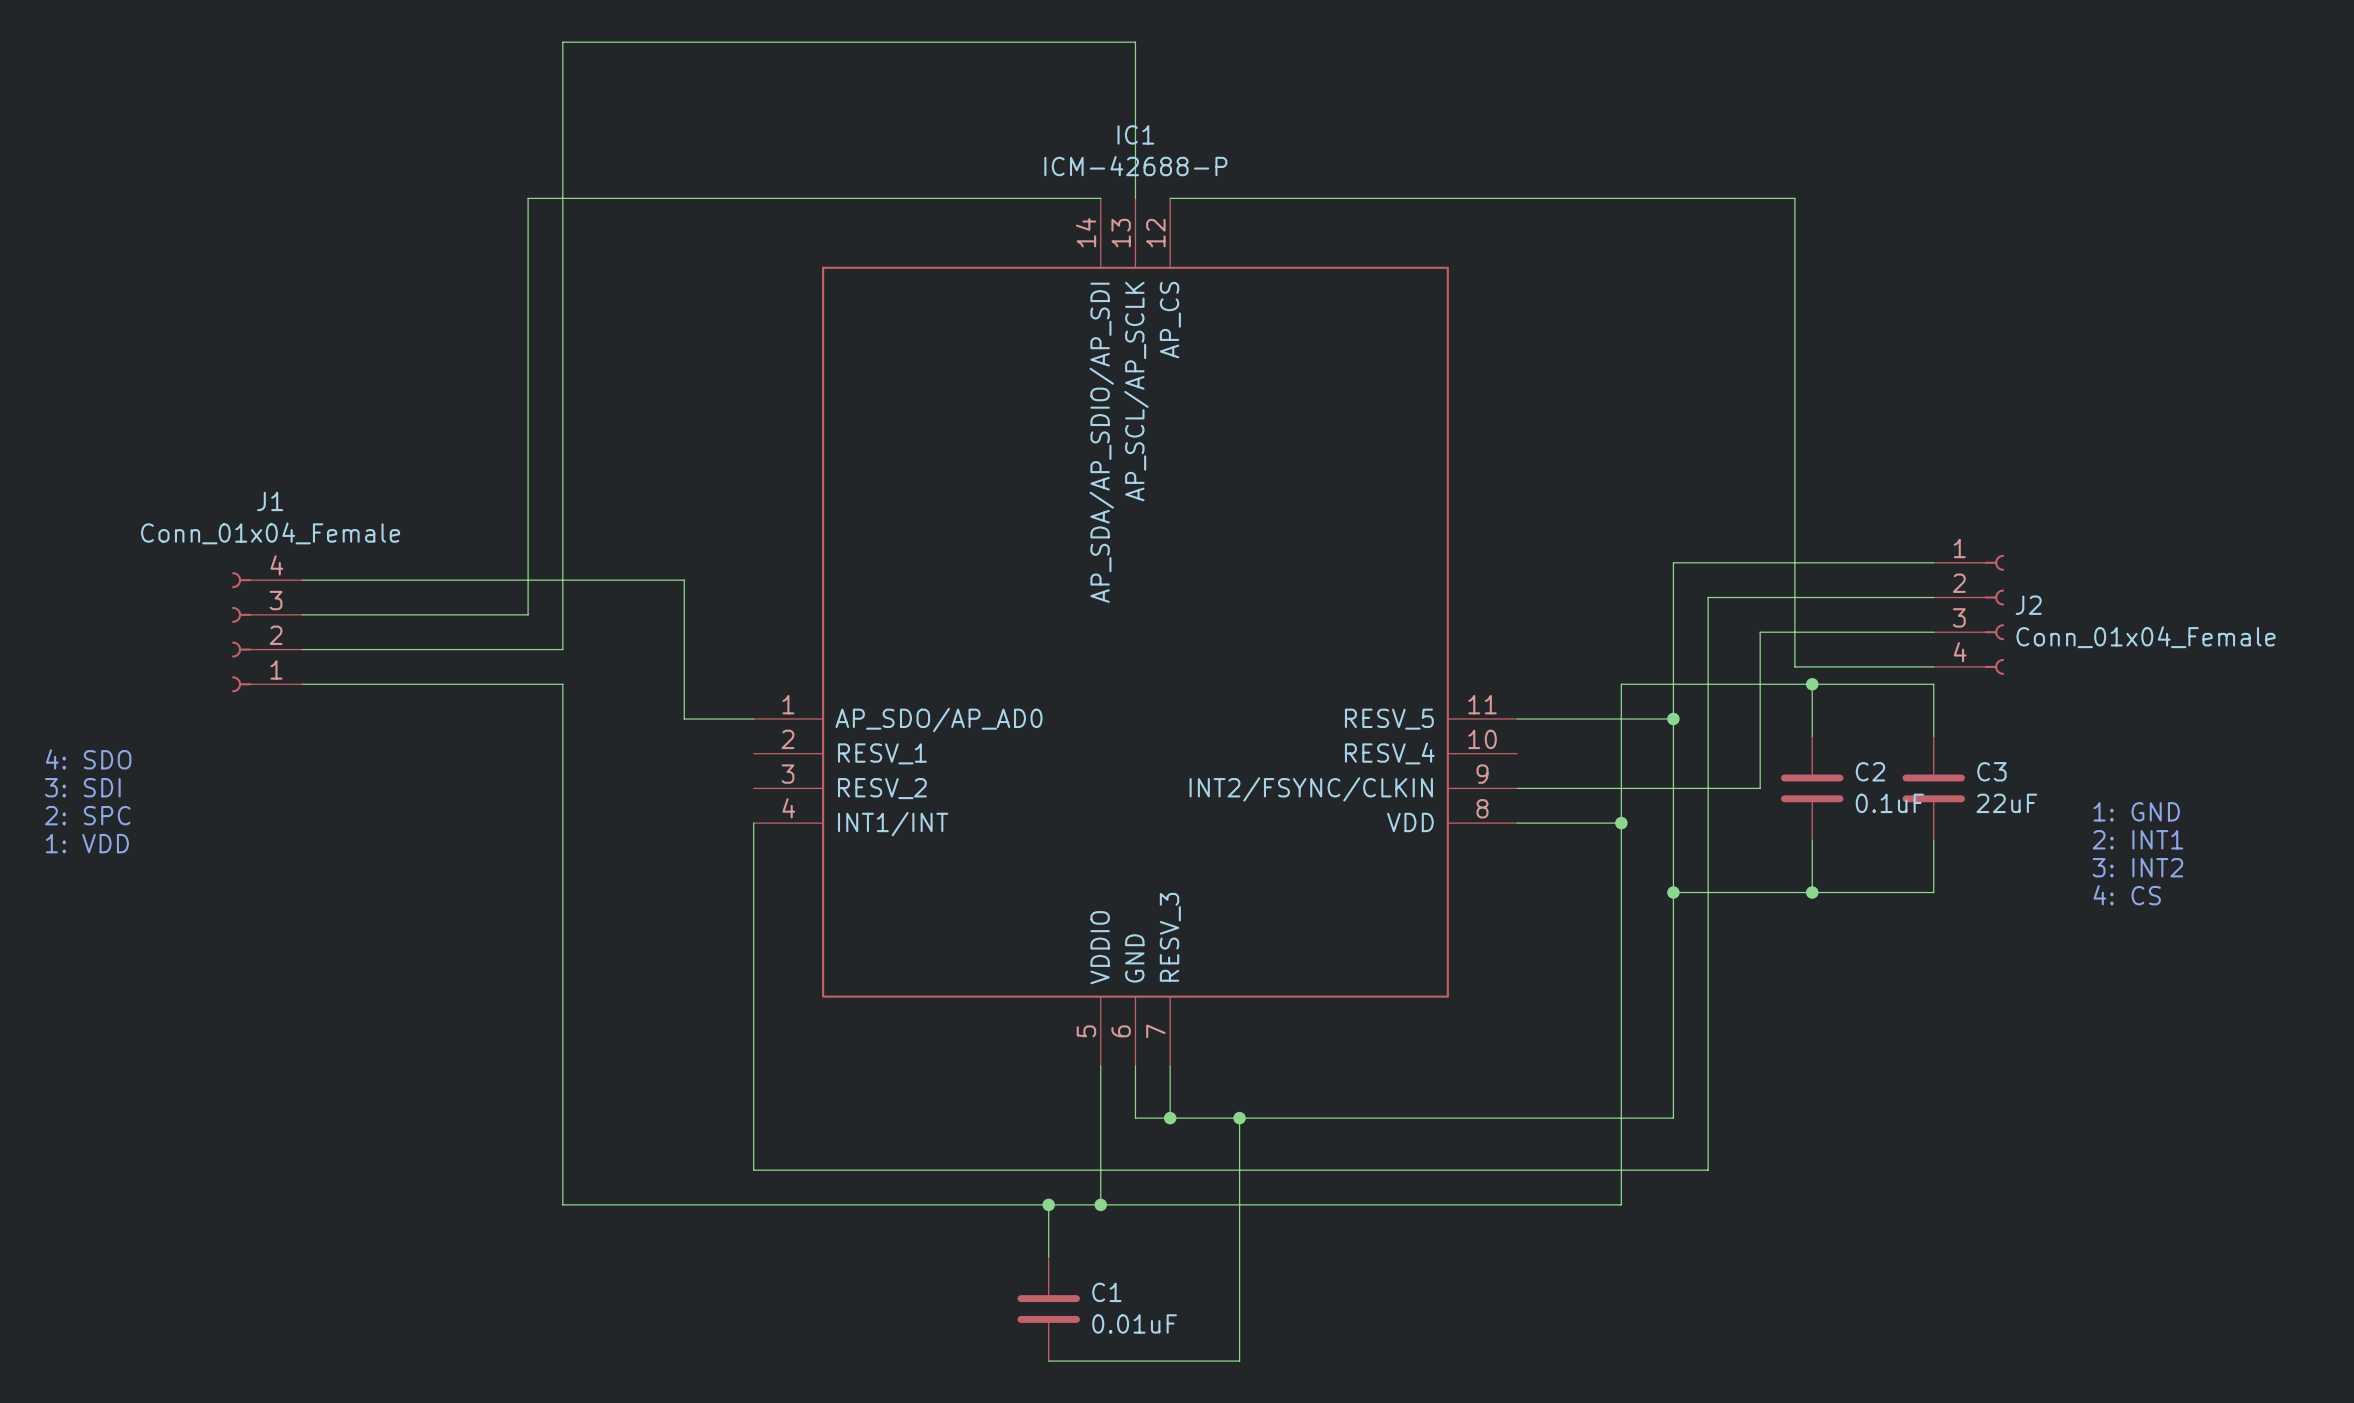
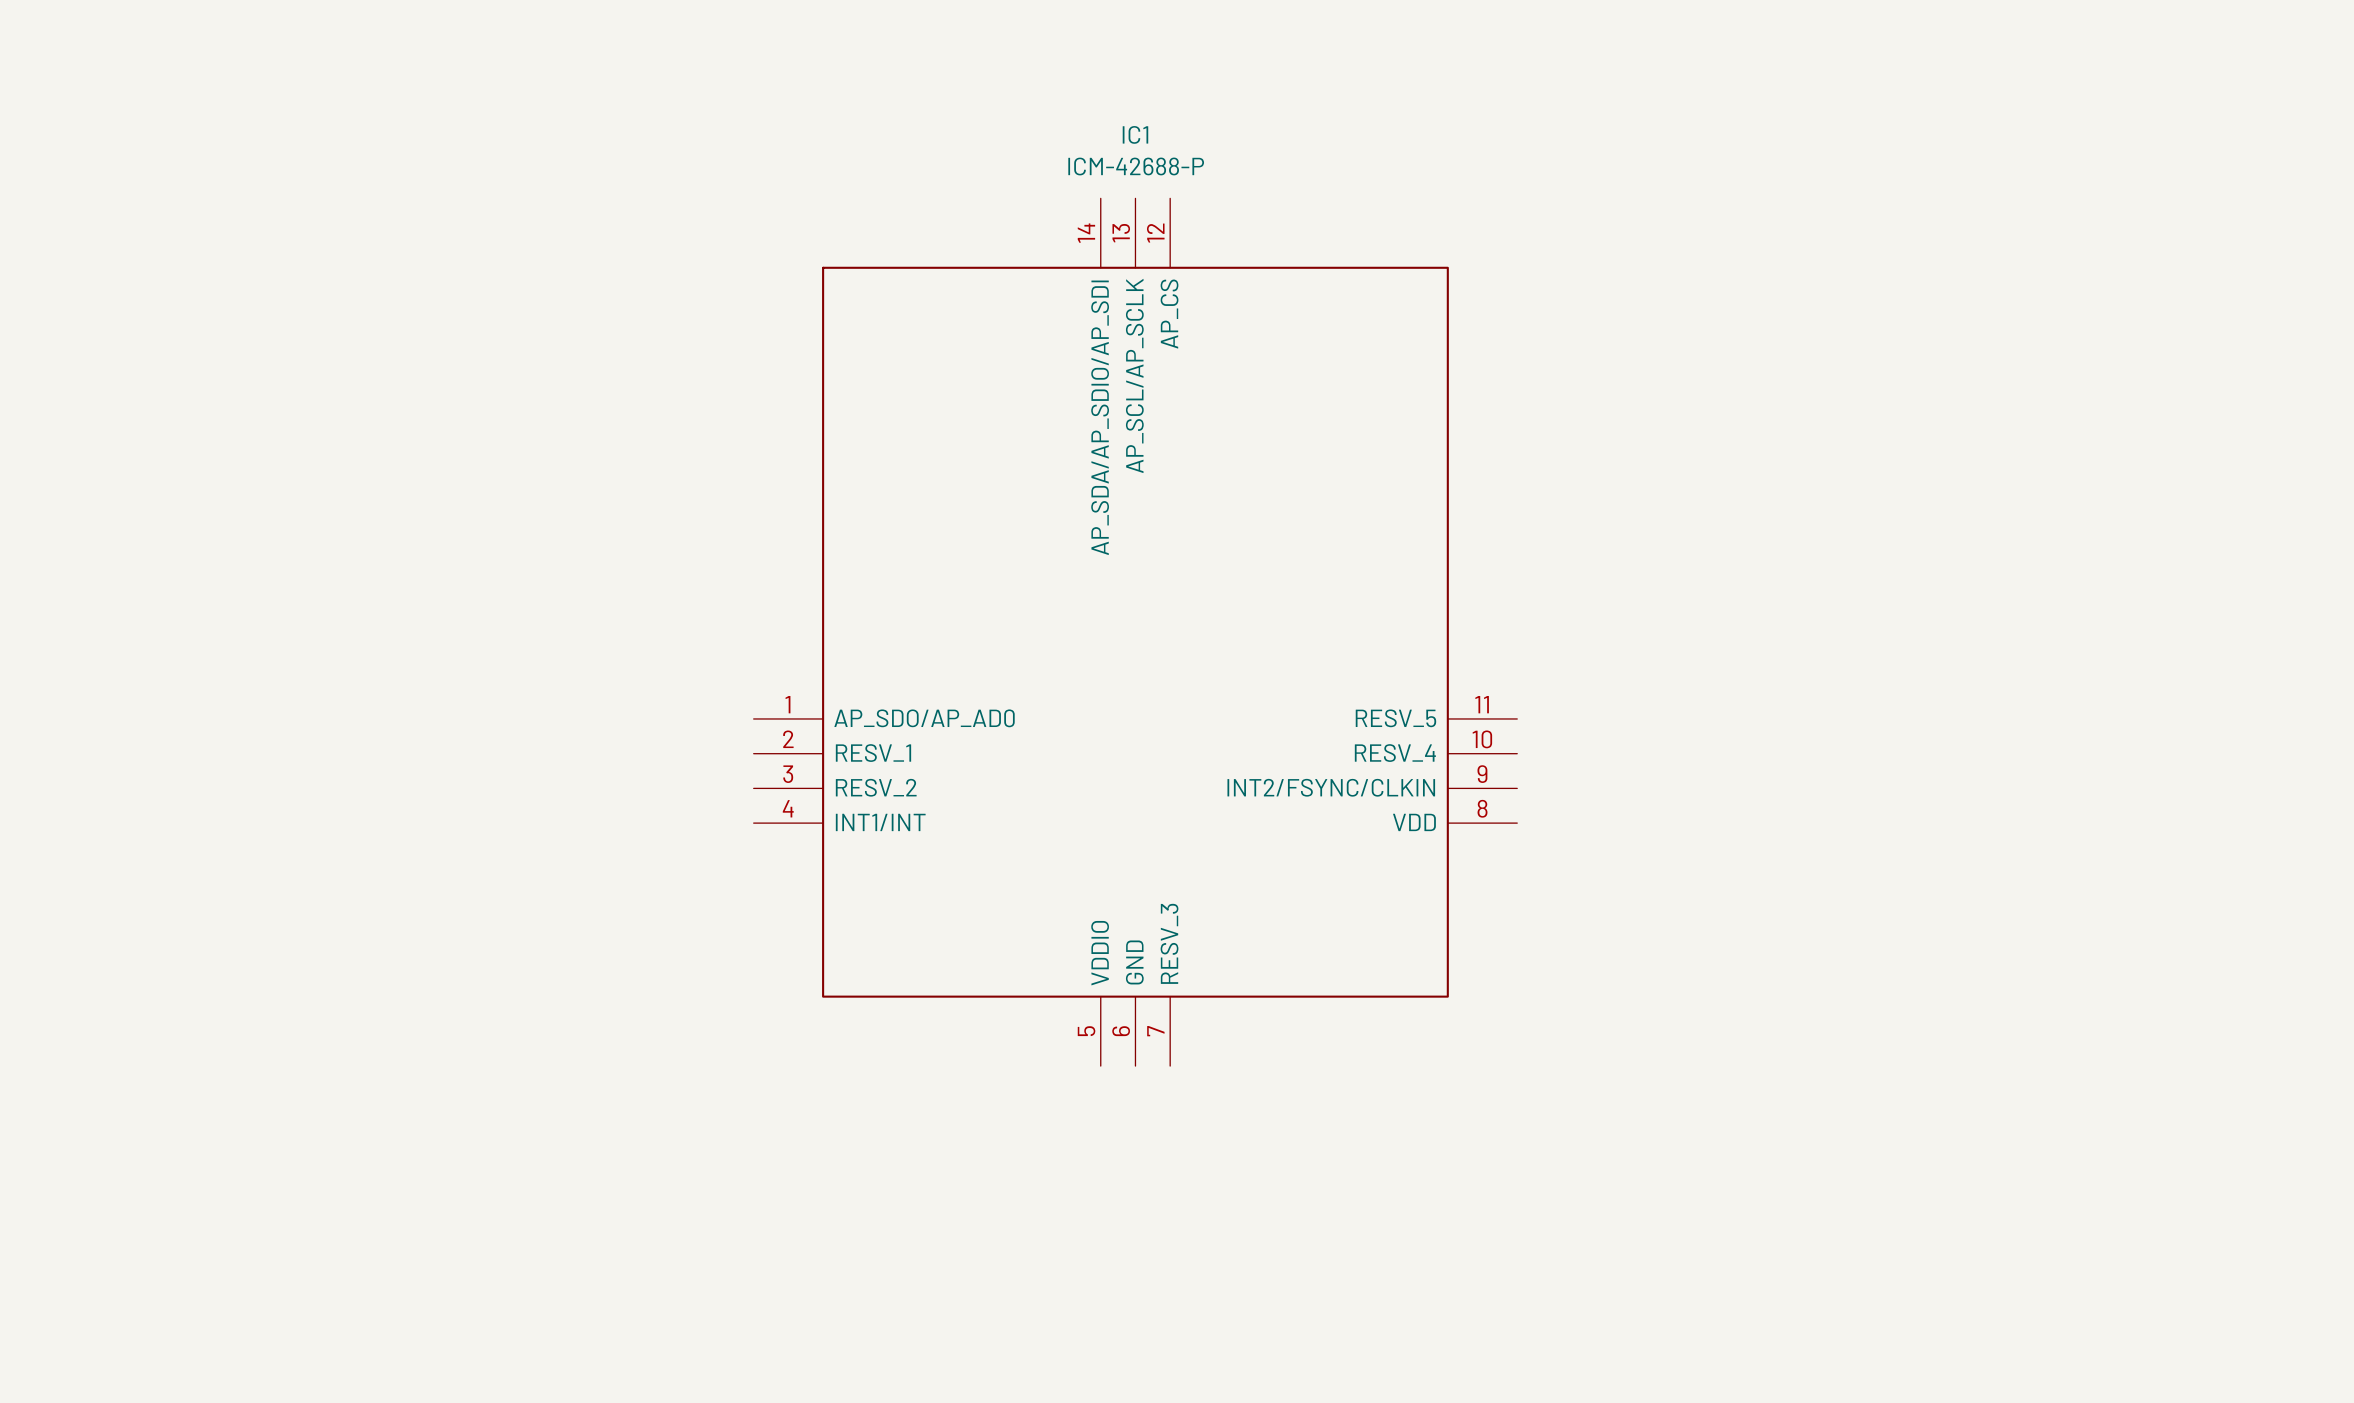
wire: (1100, 198) (528, 198) (528, 614) (302, 614) -> none
wire: (1135, 198) (1135, 42) (562, 42) (562, 649) (302, 649) -> none
wire: (1170, 198) (1794, 198) (1794, 666) (1933, 666) -> none
wire: (1933, 562) (1673, 562) (1673, 1118) (1135, 1118) (1135, 1066) -> none
wire: (302, 580) (684, 580) (684, 718) (753, 718) -> none
wire: (1933, 597) (1708, 597) (1708, 1170) (753, 1170) (753, 823) -> none
J2: Conn_01x04_Female (1968, 614) -> none
J1: Conn_01x04_Female (267, 632) -> none
wire: (1933, 632) (1760, 632) (1760, 788) (1517, 788) -> none
wire: (302, 684) (562, 684) (562, 1204) (1621, 1204) (1621, 684) (1933, 684) (1933, 736) -> none
wire: (1812, 684) (1812, 736) -> none
junction: (1812, 684) -> none
wire: (1517, 718) (1673, 718) -> none
junction: (1673, 718) -> none
text: 4: SDO (88, 759) -> none
text: 3: SDI (82, 787) -> none
C2: 0.1uF (1812, 788) -> none
C3: 22uF (1933, 788) -> none
text: 1: GND (2136, 811) -> none
text: 2: SPC (87, 815) -> none
wire: (1517, 823) (1621, 823) -> none
junction: (1621, 823) -> none
text: 2: INT1 (2137, 839) -> none
wire: (1812, 840) (1812, 892) -> none
wire: (1933, 840) (1933, 892) (1673, 892) -> none
text: 1: VDD (87, 843) -> none
text: 3: INT2 (2137, 867) -> none
junction: (1673, 892) -> none
junction: (1812, 892) -> none
text: 4: CS (2127, 895) -> none
wire: (1100, 1066) (1100, 1204) -> none
wire: (1170, 1066) (1170, 1118) -> none
junction: (1170, 1118) -> none
wire: (1239, 1118) (1239, 1361) (1048, 1361) -> none
junction: (1239, 1118) -> none
wire: (1048, 1204) (1048, 1256) -> none
junction: (1048, 1204) -> none
junction: (1100, 1204) -> none
C1: 0.01uF (1048, 1308) -> none

